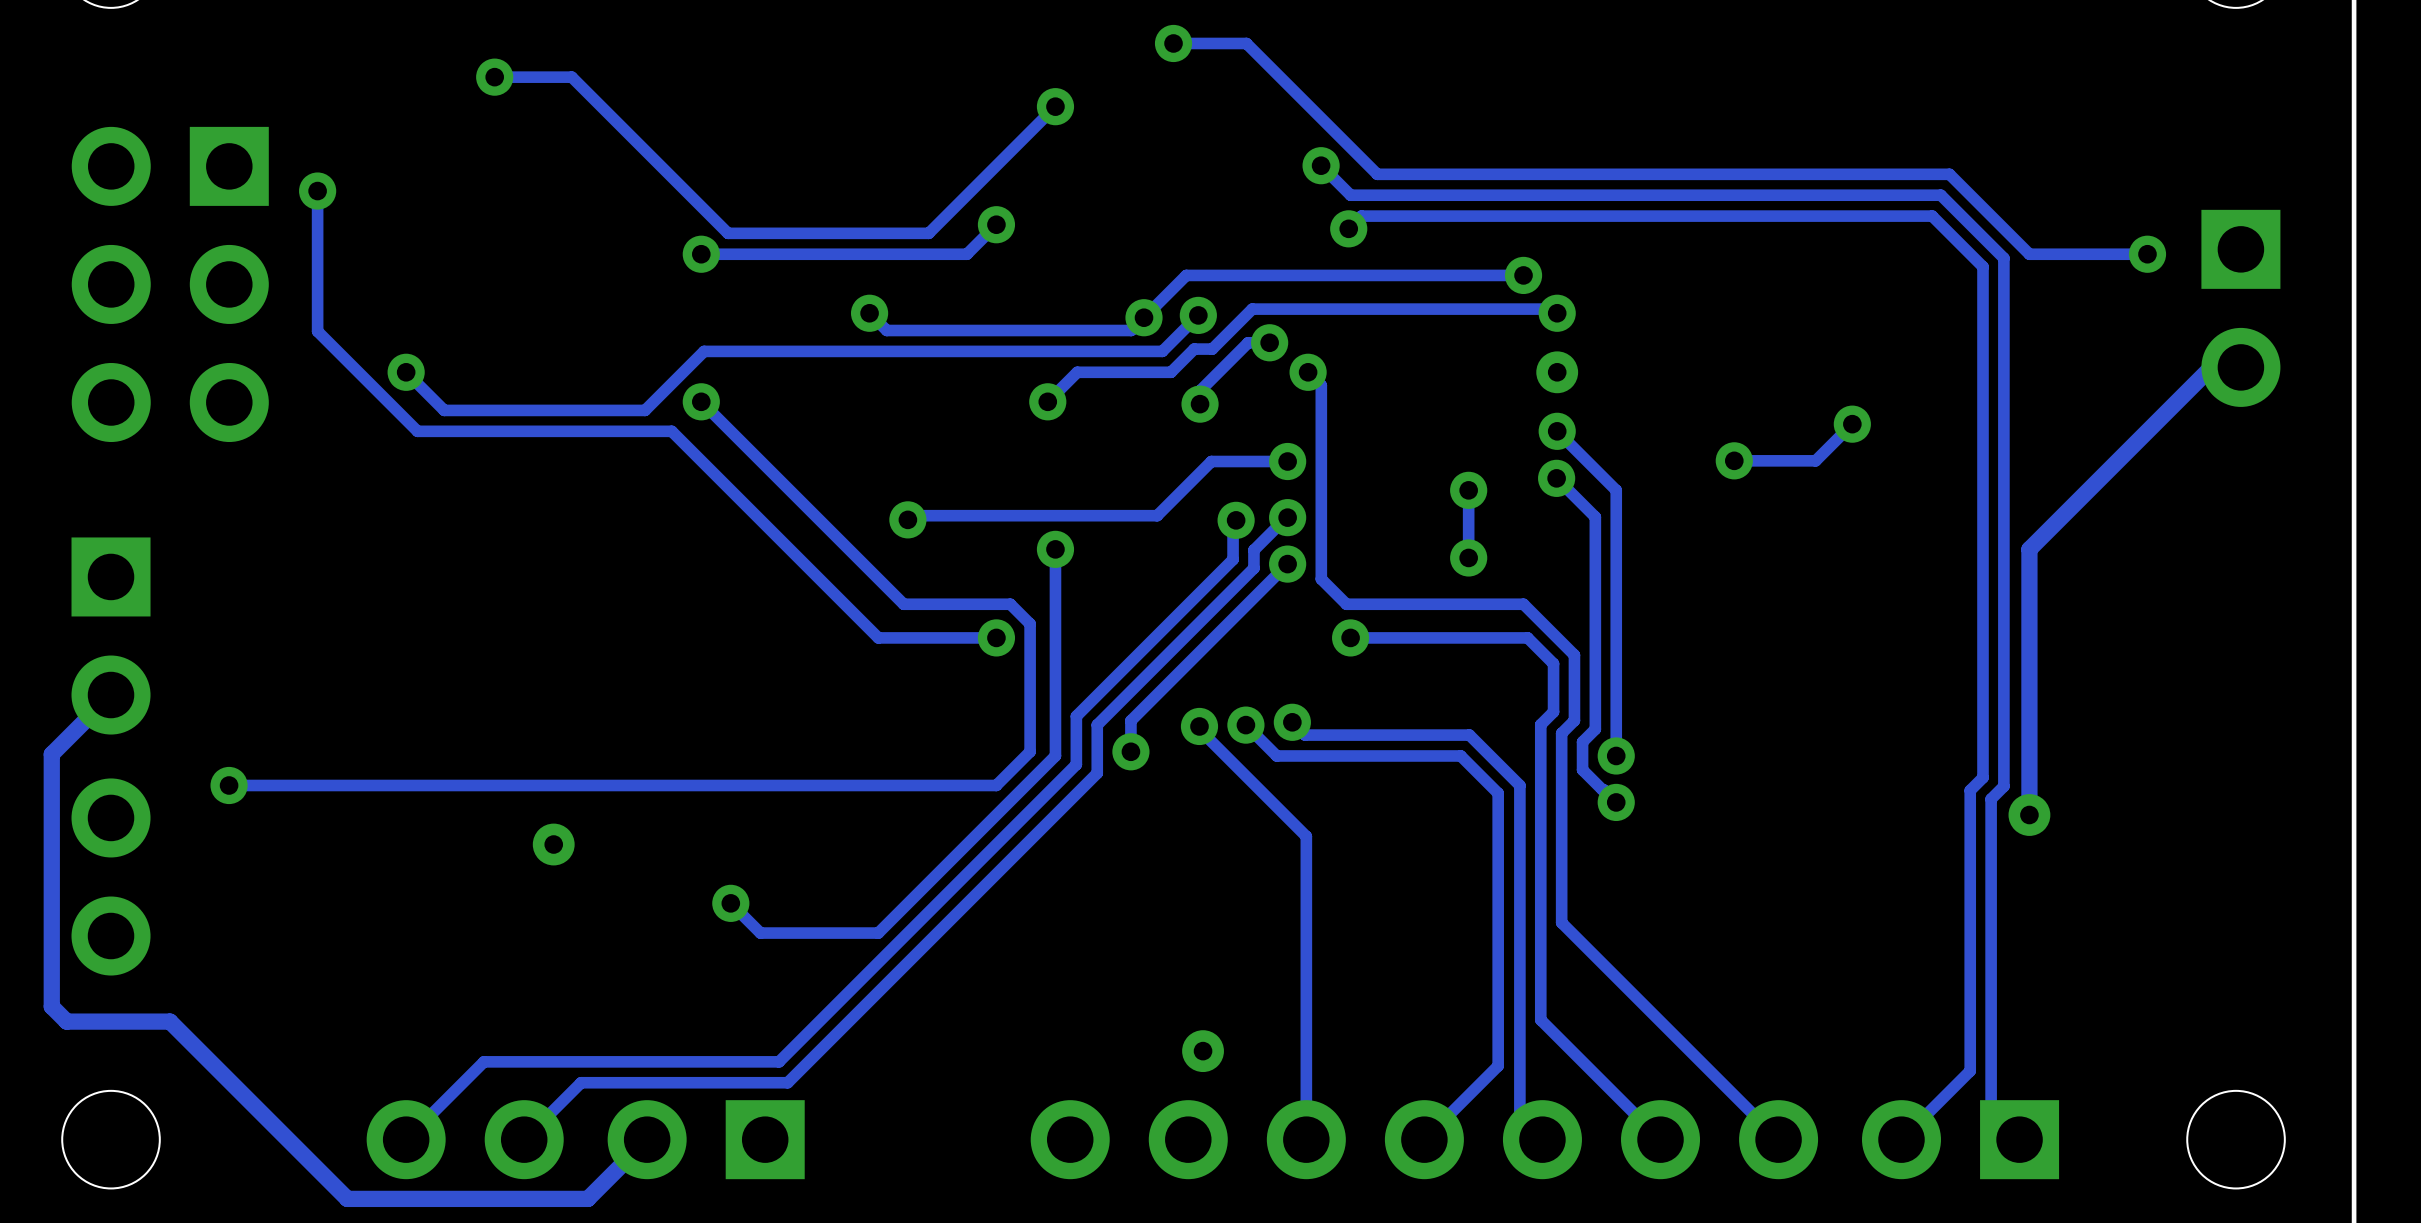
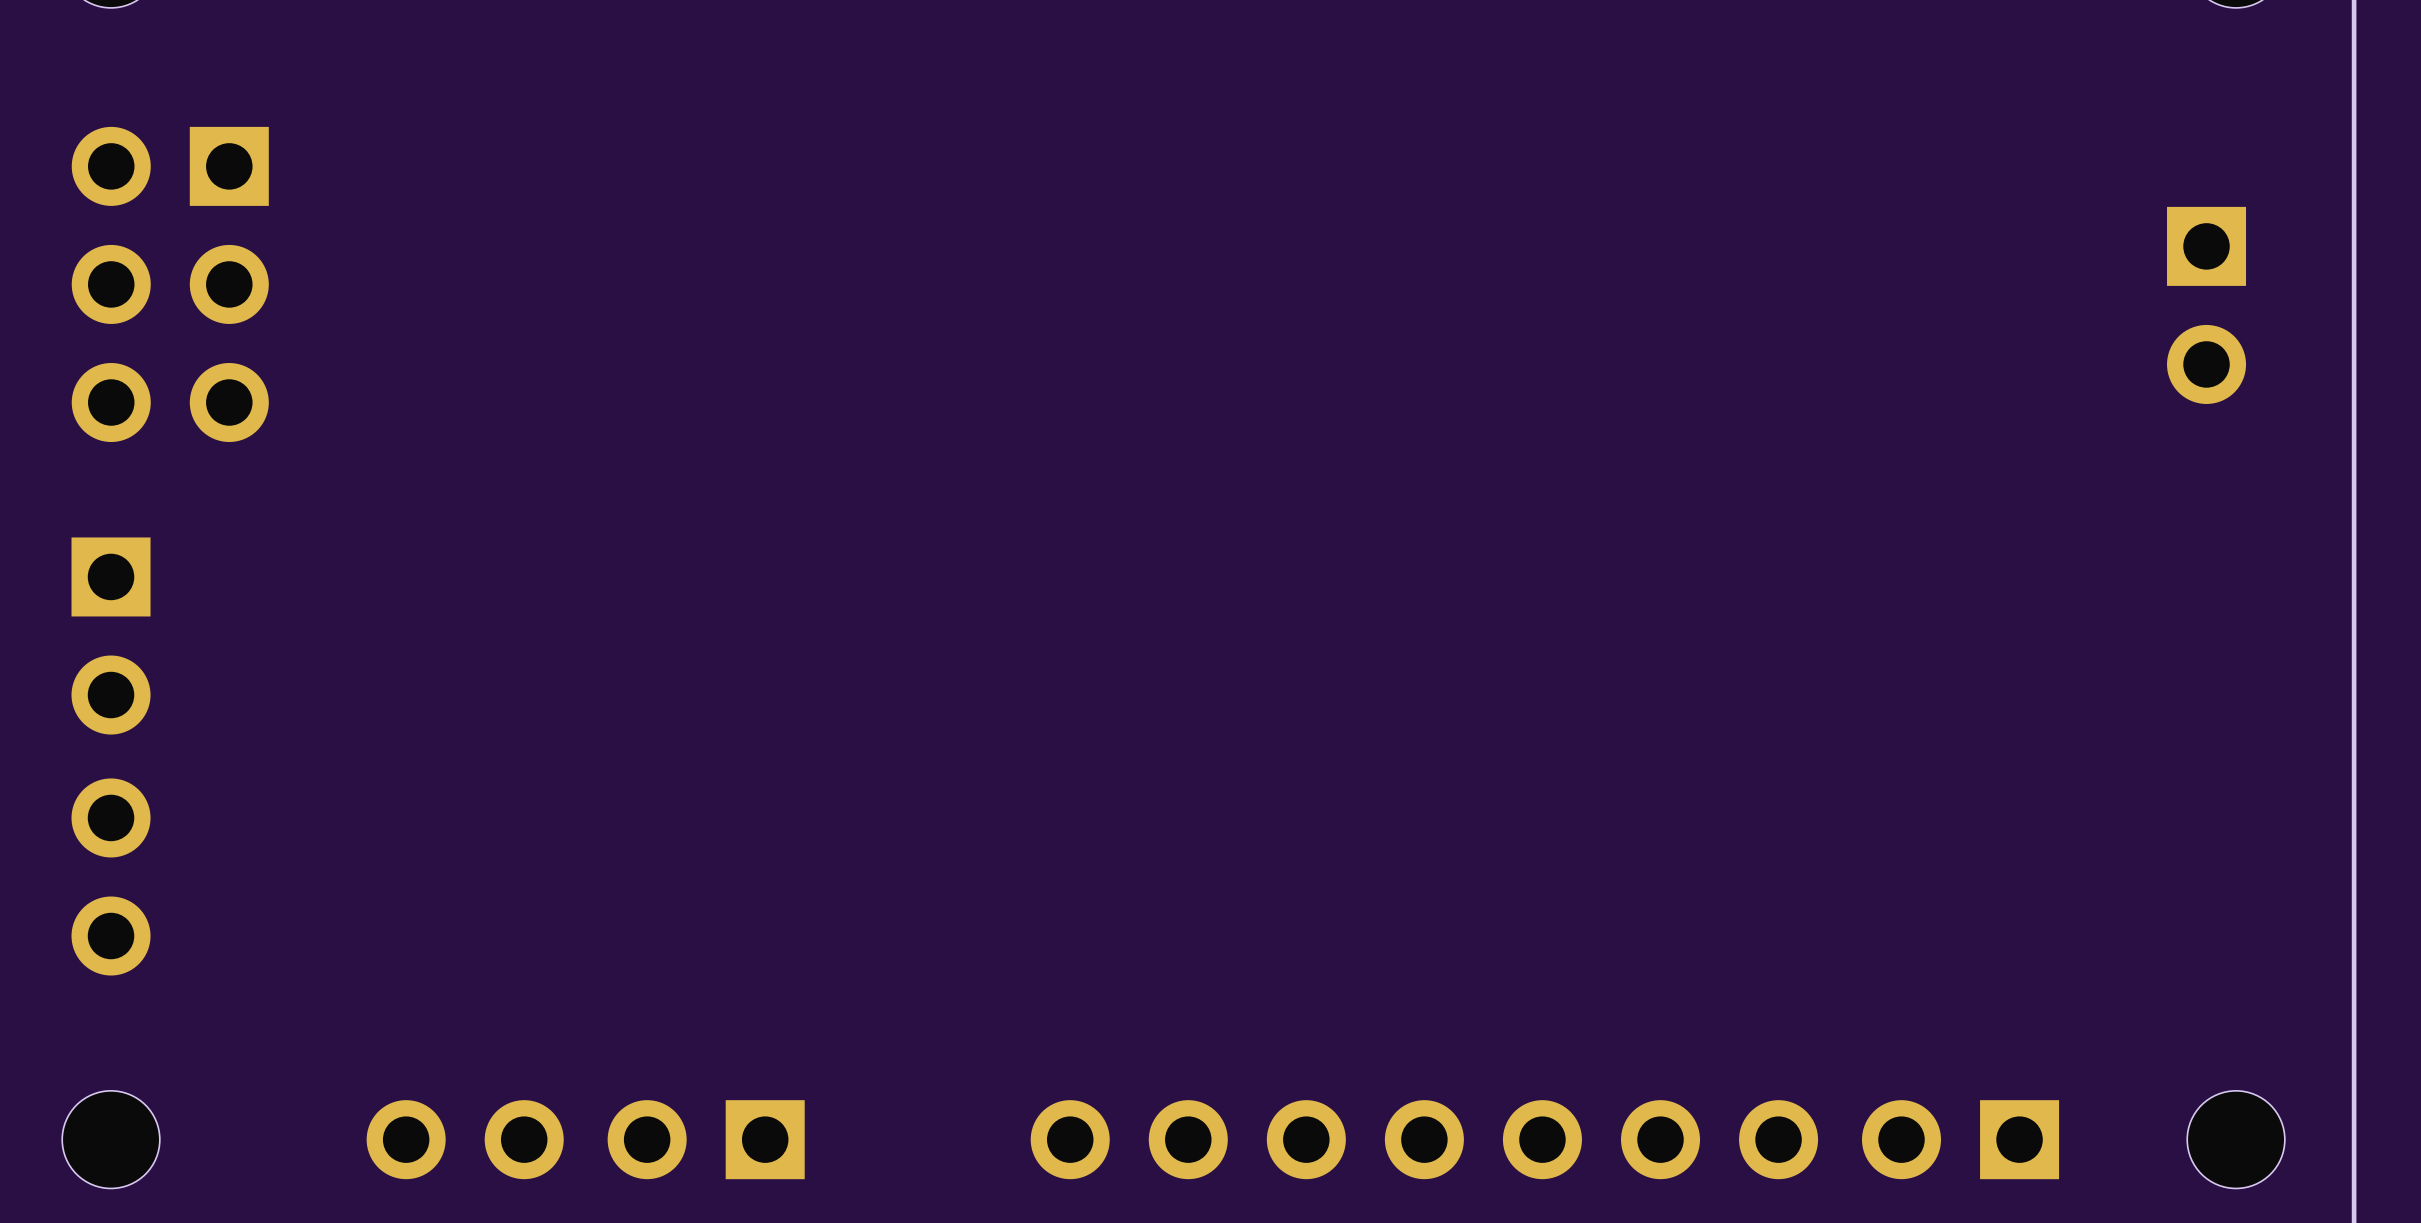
track: (1173, 43) (1246, 43) (1377, 174) (1949, 174) (2029, 254) (2147, 254) -> none
via: (1173, 43) -> none
track: (494, 77) (571, 77) (728, 233) (928, 233) (1055, 106) -> none
via: (494, 77) -> none
via: (1055, 106) -> none
track: (1321, 165) (1350, 195) (1940, 195) (2003, 258) (2003, 786) (1991, 799) (1991, 1111) (2019, 1139) -> none
via: (1321, 165) -> none
track: (317, 191) (317, 331) (417, 431) (671, 431) (878, 637) (996, 637) -> none
via: (317, 191) -> none
track: (996, 224) (966, 254) (701, 254) -> none
via: (996, 224) -> none
track: (1348, 228) (1361, 216) (1932, 216) (1983, 266) (1983, 777) (1970, 790) (1970, 1070) (1901, 1139) -> none
via: (1348, 228) -> none
via: (701, 254) -> none
via: (2147, 254) -> none
track: (1523, 275) (1186, 275) (1131, 330) (886, 330) (869, 313) -> none
via: (1523, 275) -> none
part position: (2240, 308) -> (2206, 305)
via: (869, 313) -> none
track: (1557, 313) (1553, 309) (1252, 309) (1212, 349) (1194, 349) (1171, 372) (1077, 372) (1047, 401) -> none
via: (1557, 313) -> none
track: (1198, 315) (1162, 351) (704, 351) (645, 410) (444, 410) (406, 372) -> none
via: (1198, 315) -> none
via: (1144, 317) -> none
track: (1269, 342) (1248, 342) (1200, 390) (1200, 404) -> none
via: (1269, 342) -> none
track: (2240, 367) (2211, 367) (2029, 549) (2029, 815) -> none
via: (406, 372) -> none
track: (1308, 372) (1321, 385) (1321, 579) (1346, 604) (1523, 604) (1574, 655) (1574, 720) (1561, 733) (1561, 922) (1778, 1139) -> none
via: (1308, 372) -> none
via: (1557, 372) -> none
track: (701, 401) (903, 604) (1010, 604) (1030, 623) (1030, 751) (996, 785) (229, 785) -> none
via: (701, 401) -> none
via: (1047, 401) -> none
via: (1200, 404) -> none
track: (1852, 424) (1815, 460) (1734, 460) -> none
via: (1852, 424) -> none
track: (1557, 431) (1616, 490) (1616, 755) -> none
via: (1557, 431) -> none
via: (1734, 460) -> none
track: (1287, 461) (1211, 461) (1157, 515) (912, 515) (907, 519) -> none
via: (1287, 461) -> none
track: (1556, 478) (1595, 517) (1595, 729) (1582, 742) (1582, 769) (1616, 802) -> none
via: (1556, 478) -> none
track: (1468, 490) (1468, 557) -> none
via: (1468, 490) -> none
track: (1287, 517) (1253, 550) (1253, 568) (1097, 724) (1097, 773) (787, 1082) (581, 1082) (524, 1139) -> none
via: (1287, 517) -> none
via: (907, 519) -> none
track: (1236, 520) (1233, 523) (1233, 559) (1076, 716) (1076, 764) (779, 1061) (483, 1061) (406, 1139) -> none
via: (1236, 520) -> none
track: (1055, 549) (1055, 755) (878, 933) (760, 933) (730, 903) -> none
via: (1055, 549) -> none
via: (1468, 557) -> none
track: (1287, 564) (1130, 720) (1130, 751) -> none
via: (1287, 564) -> none
via: (996, 637) -> none
track: (1350, 637) (1527, 637) (1553, 663) (1553, 711) (1540, 724) (1540, 1019) (1660, 1139) -> none
via: (1350, 637) -> none
track: (111, 695) (51, 754) (51, 1006) (66, 1021) (170, 1021) (347, 1198) (587, 1198) (647, 1139) -> none
track: (1292, 722) (1305, 735) (1469, 735) (1519, 785) (1519, 1117) (1542, 1139) -> none
via: (1292, 722) -> none
track: (1245, 725) (1276, 755) (1460, 755) (1498, 793) (1498, 1065) (1424, 1139) -> none
via: (1245, 725) -> none
track: (1199, 726) (1199, 729) (1306, 836) (1306, 1139) -> none
via: (1199, 726) -> none
via: (1130, 751) -> none
via: (1616, 755) -> none
via: (229, 785) -> none
via: (1616, 802) -> none
via: (2029, 815) -> none
via: (553, 844) -> none
via: (730, 903) -> none
via: (1203, 1051) -> none

